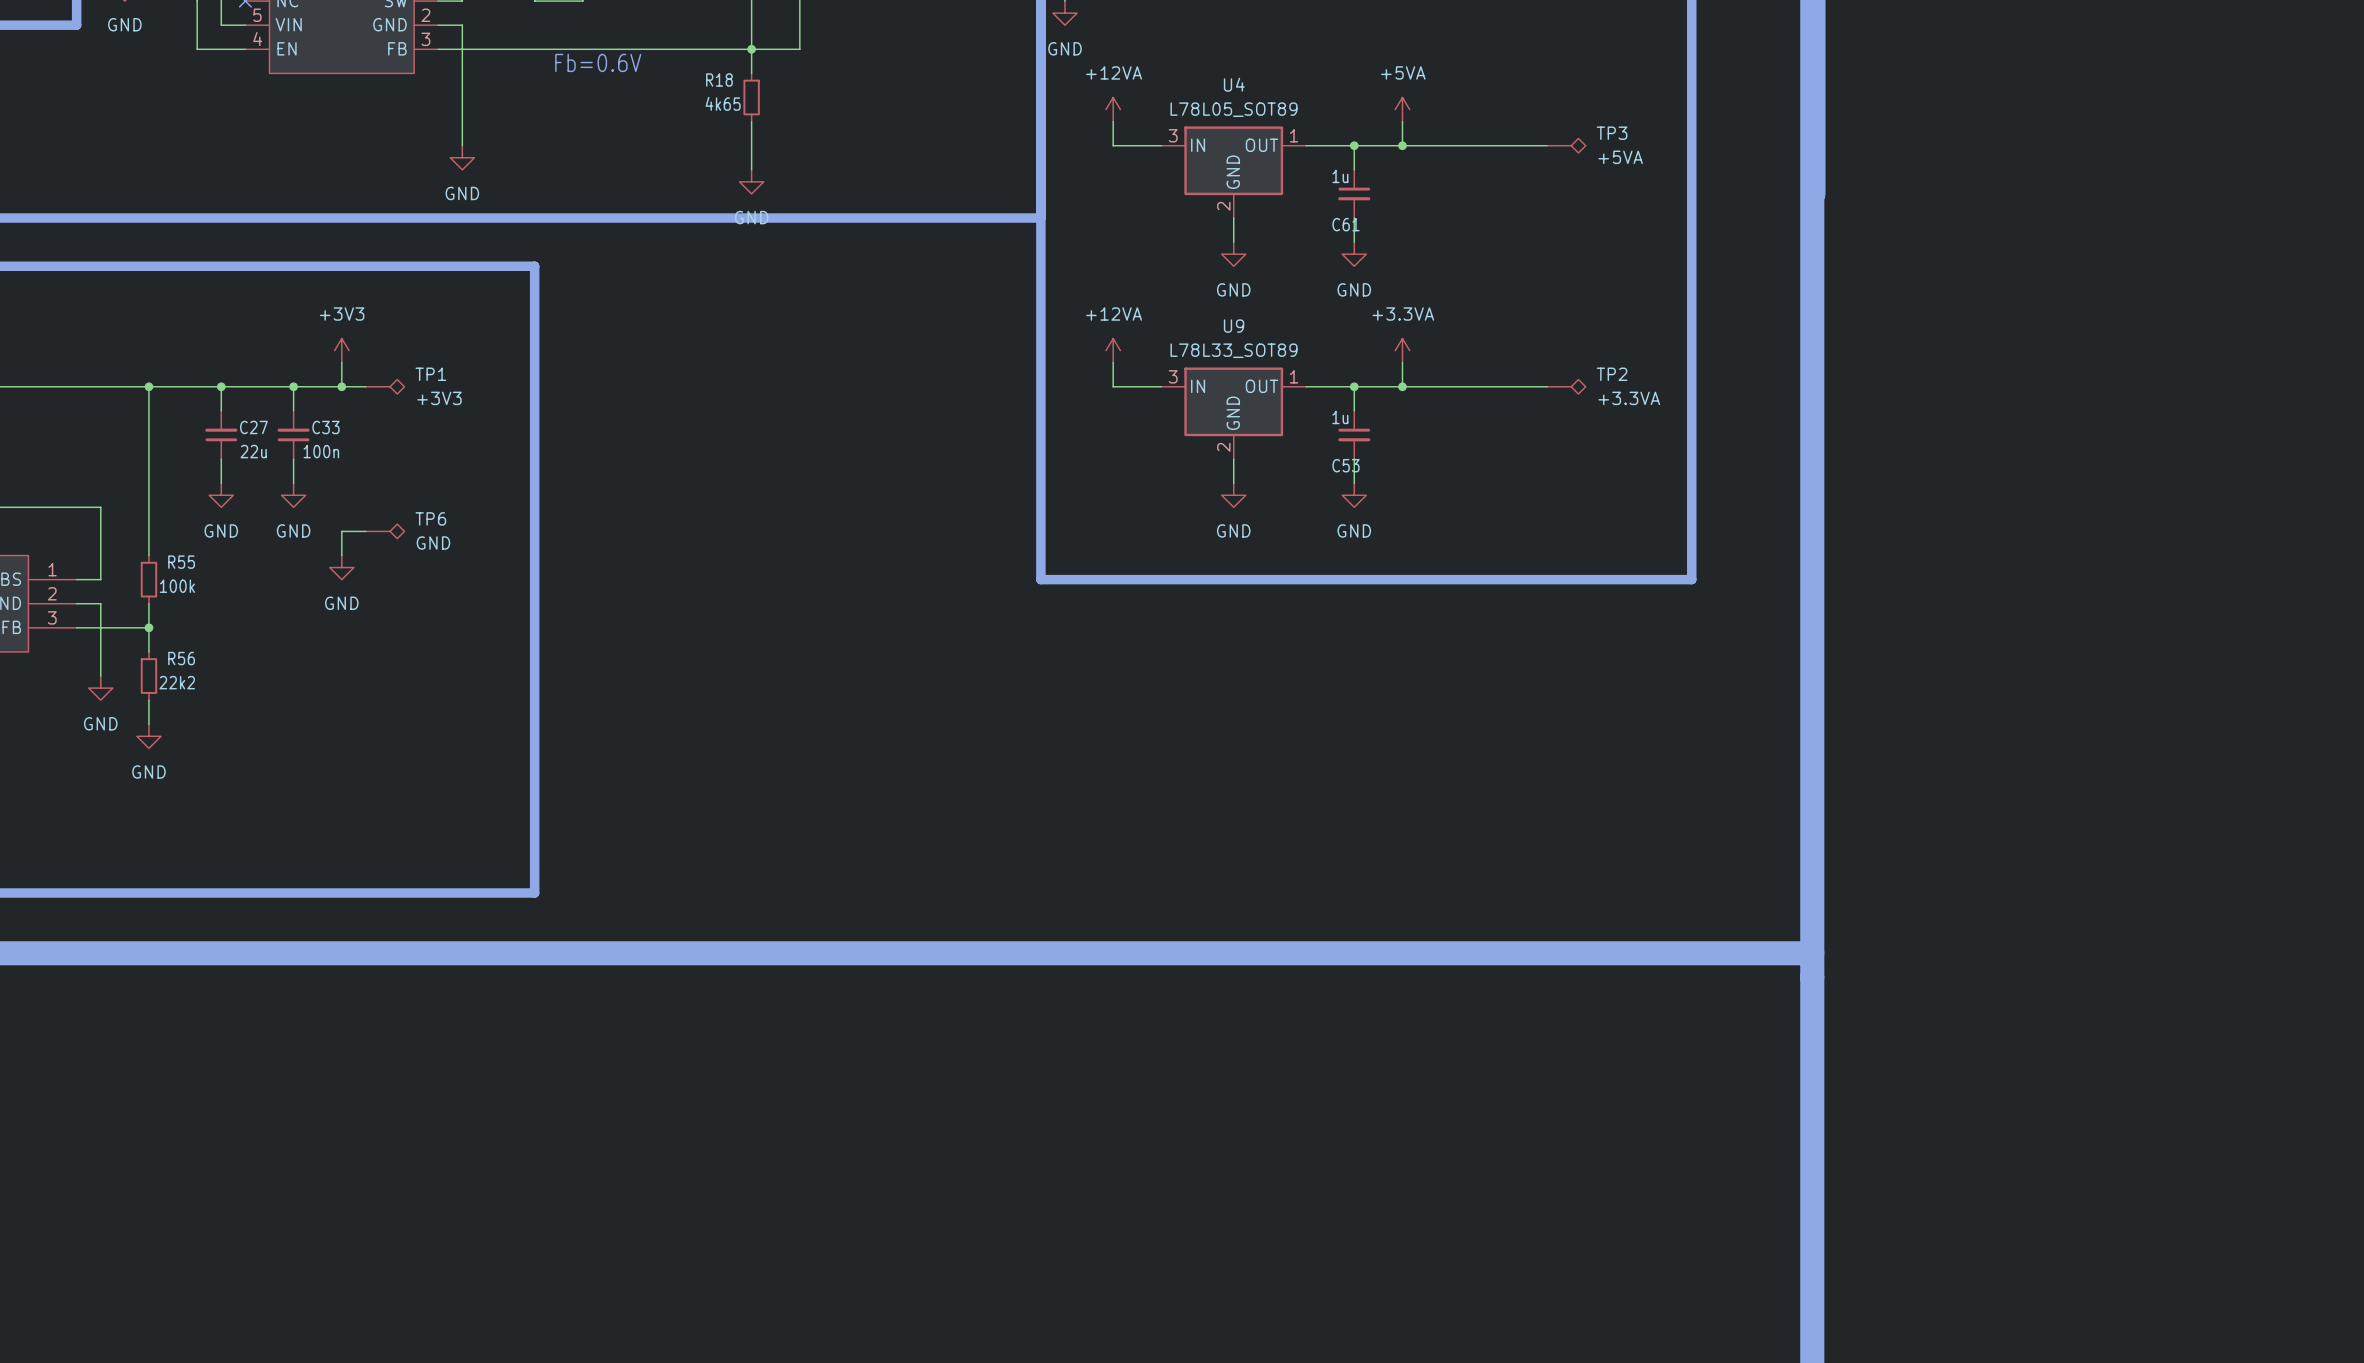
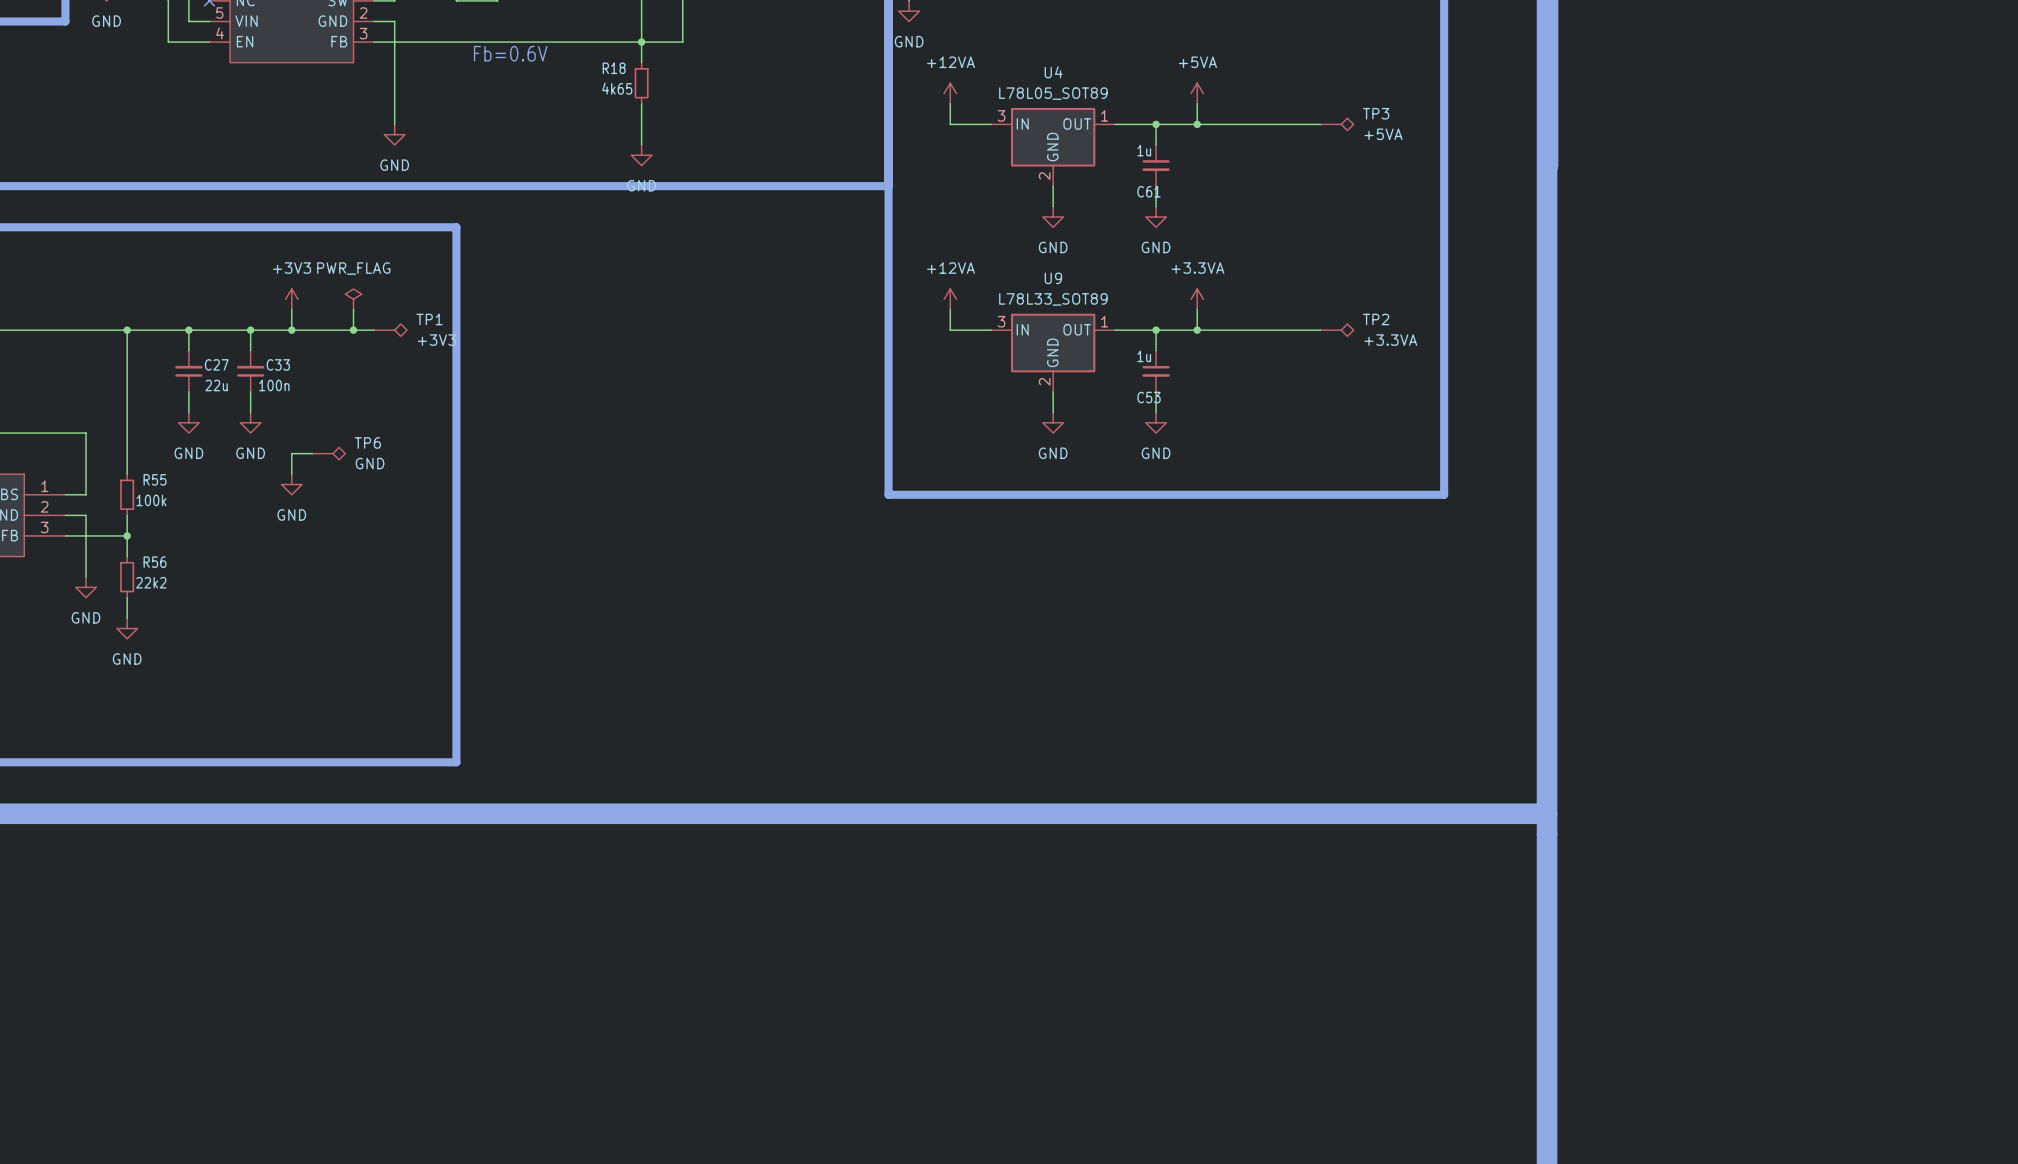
power symbol: none -> PWR_FLAG (353, 299)
wire: none -> (353, 309) (353, 330)
wire: none -> (312, 330) (374, 330)
TP1 position: (385, 386) -> (390, 330)
junction: none -> (353, 330)

